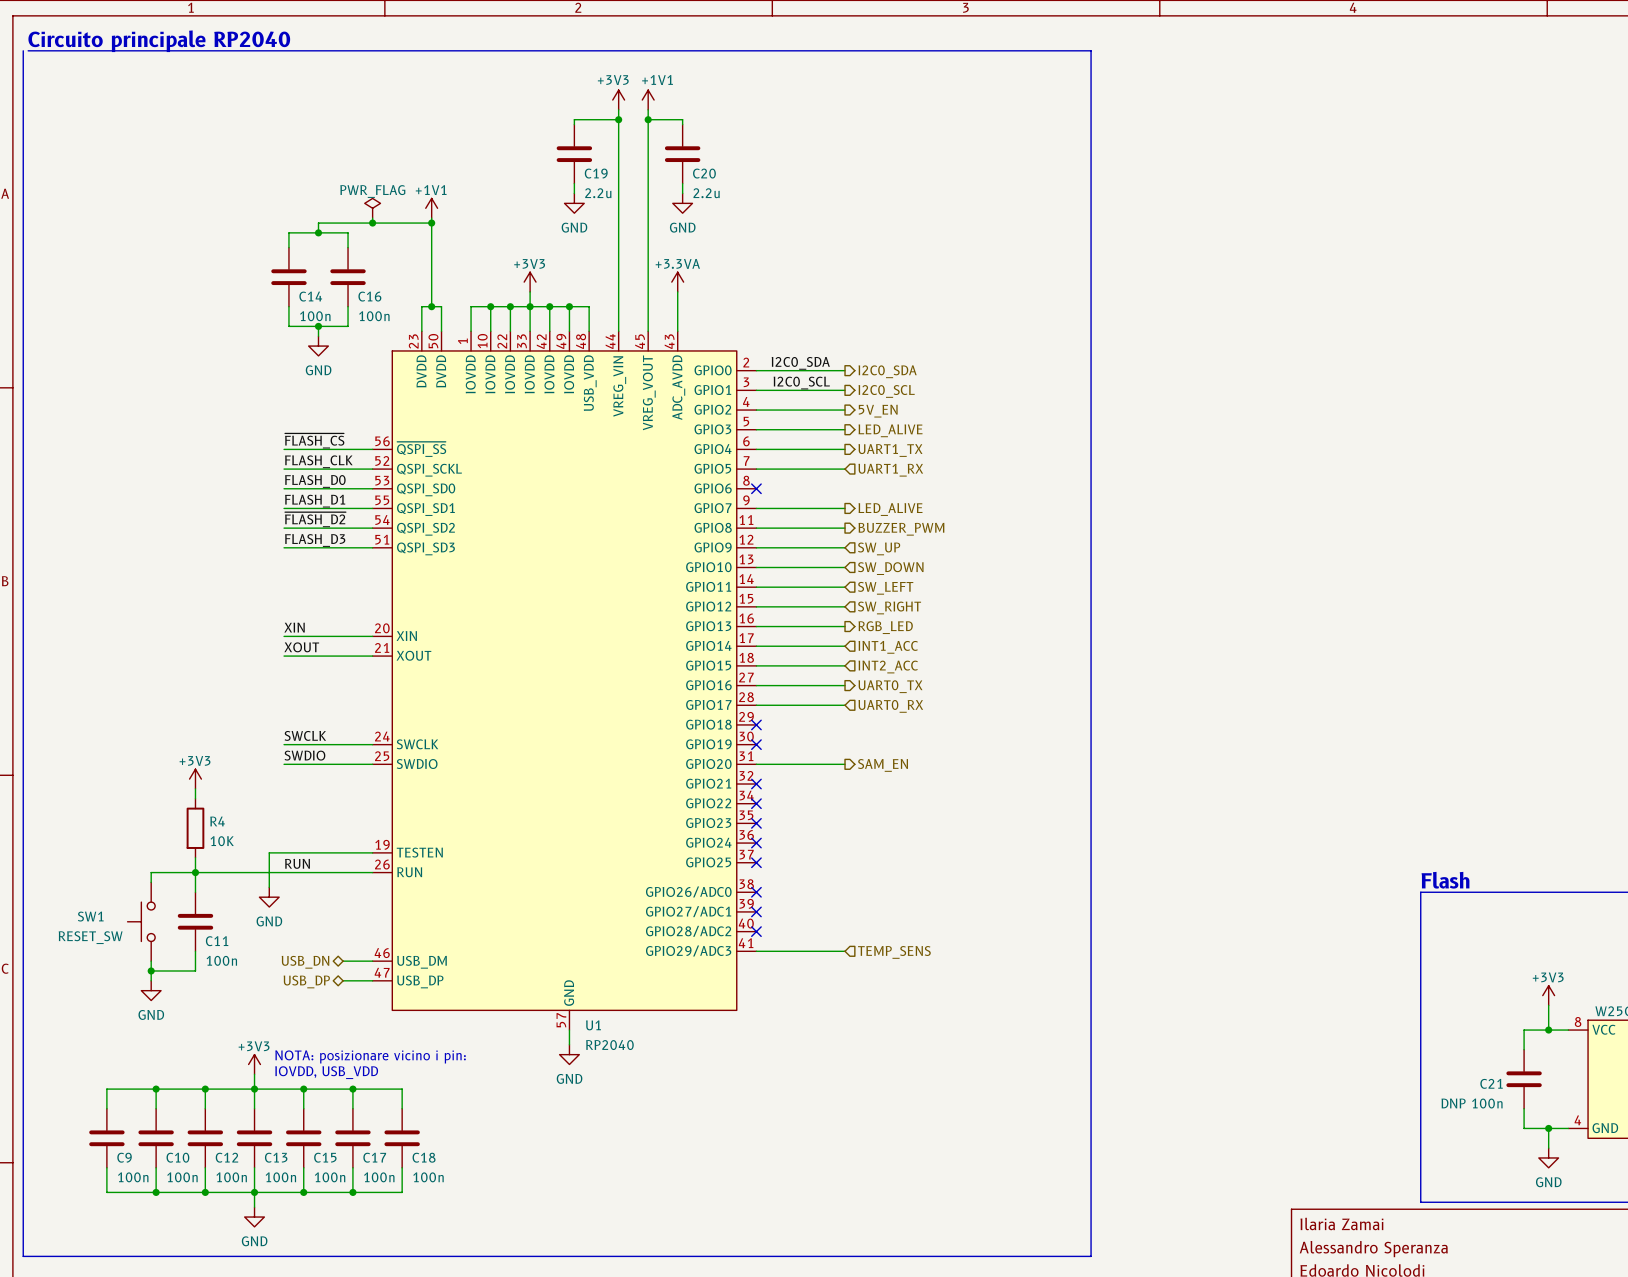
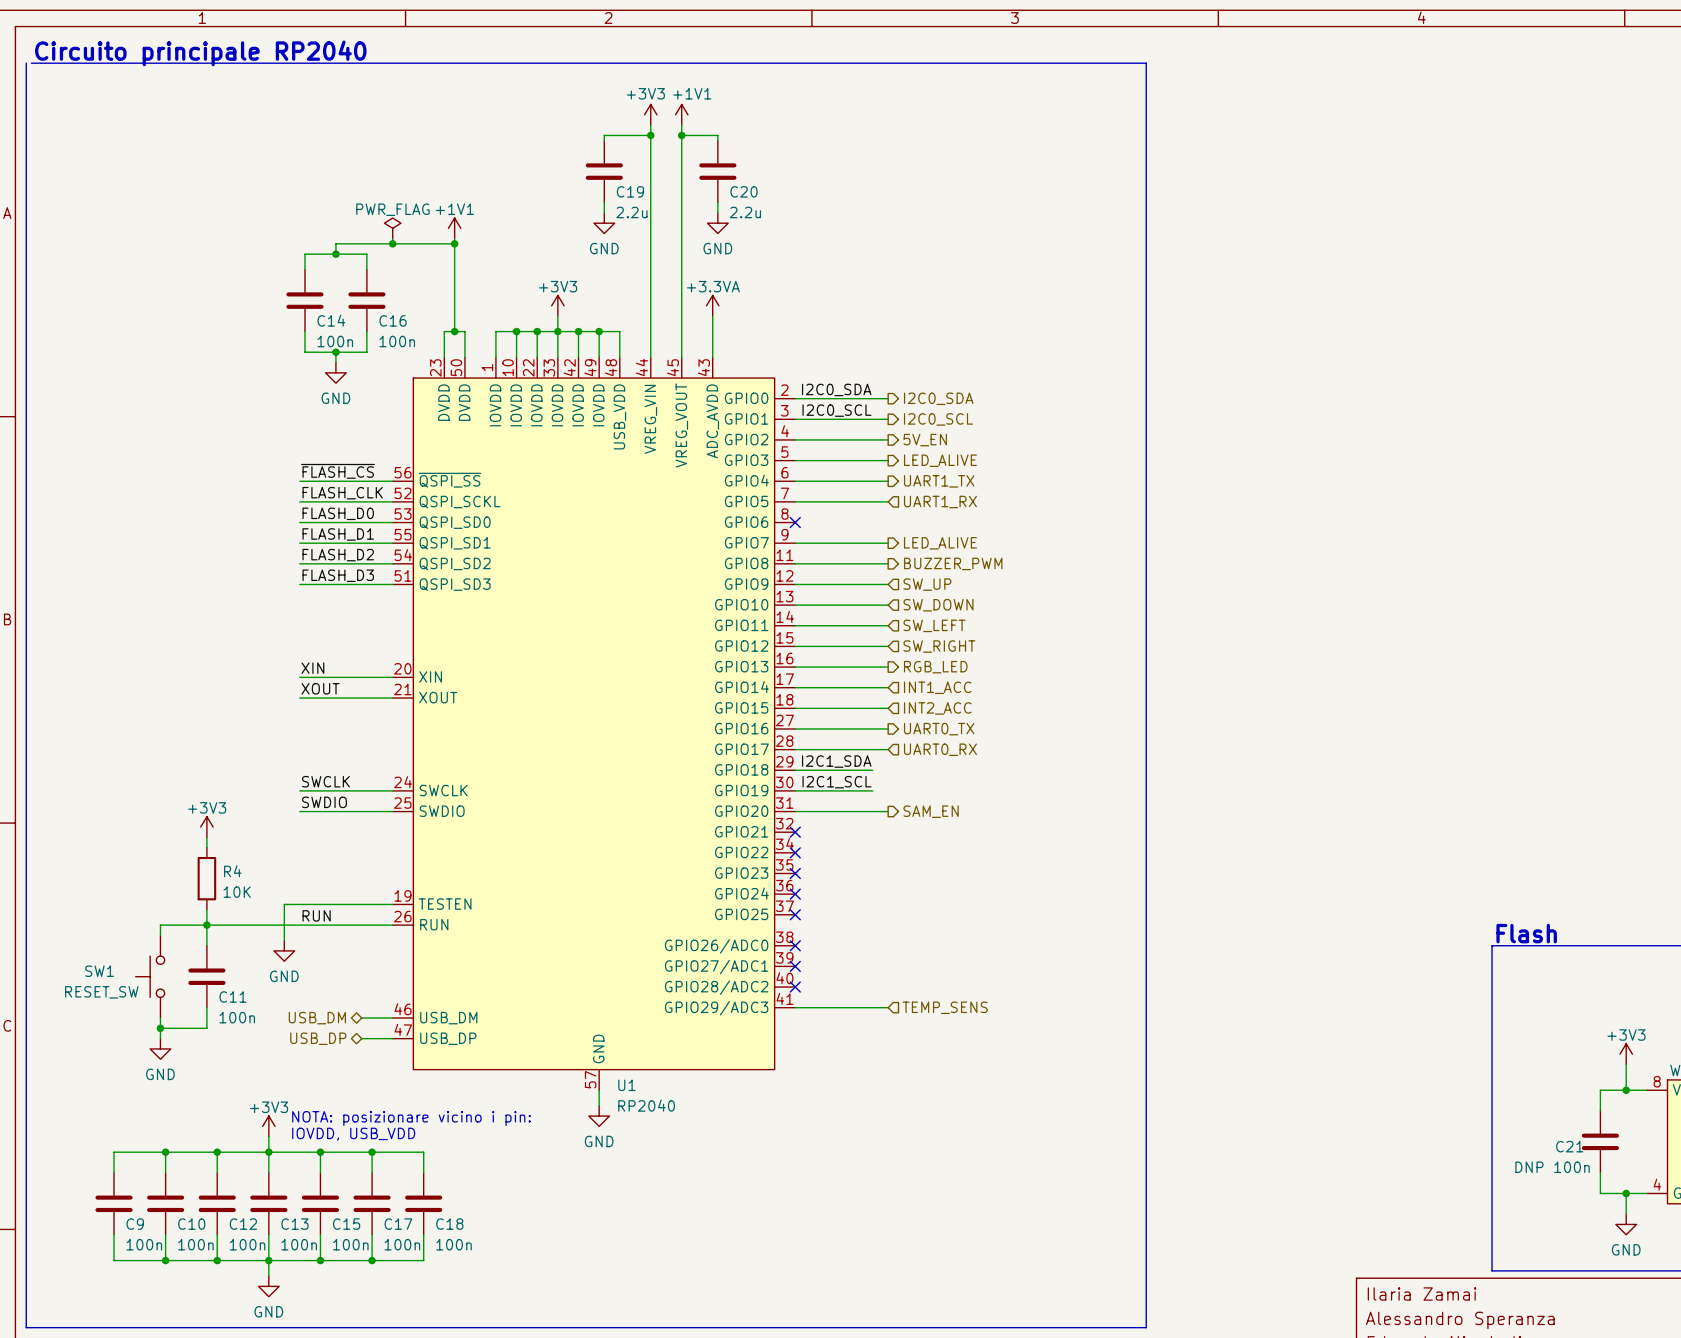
label: ~{FLASH_D2} (315, 519) -> FLASH_D2 (338, 555)
label: none -> I2C1_SDA (836, 761)
wire: none -> (795, 770) (872, 770)
no-connect mark: (756, 724) -> none
label: none -> I2C1_SCL (836, 782)
wire: none -> (795, 790) (872, 790)
no-connect mark: (756, 744) -> none
hierarchical label: USB_DN (305, 962) -> USB_DM (317, 1018)

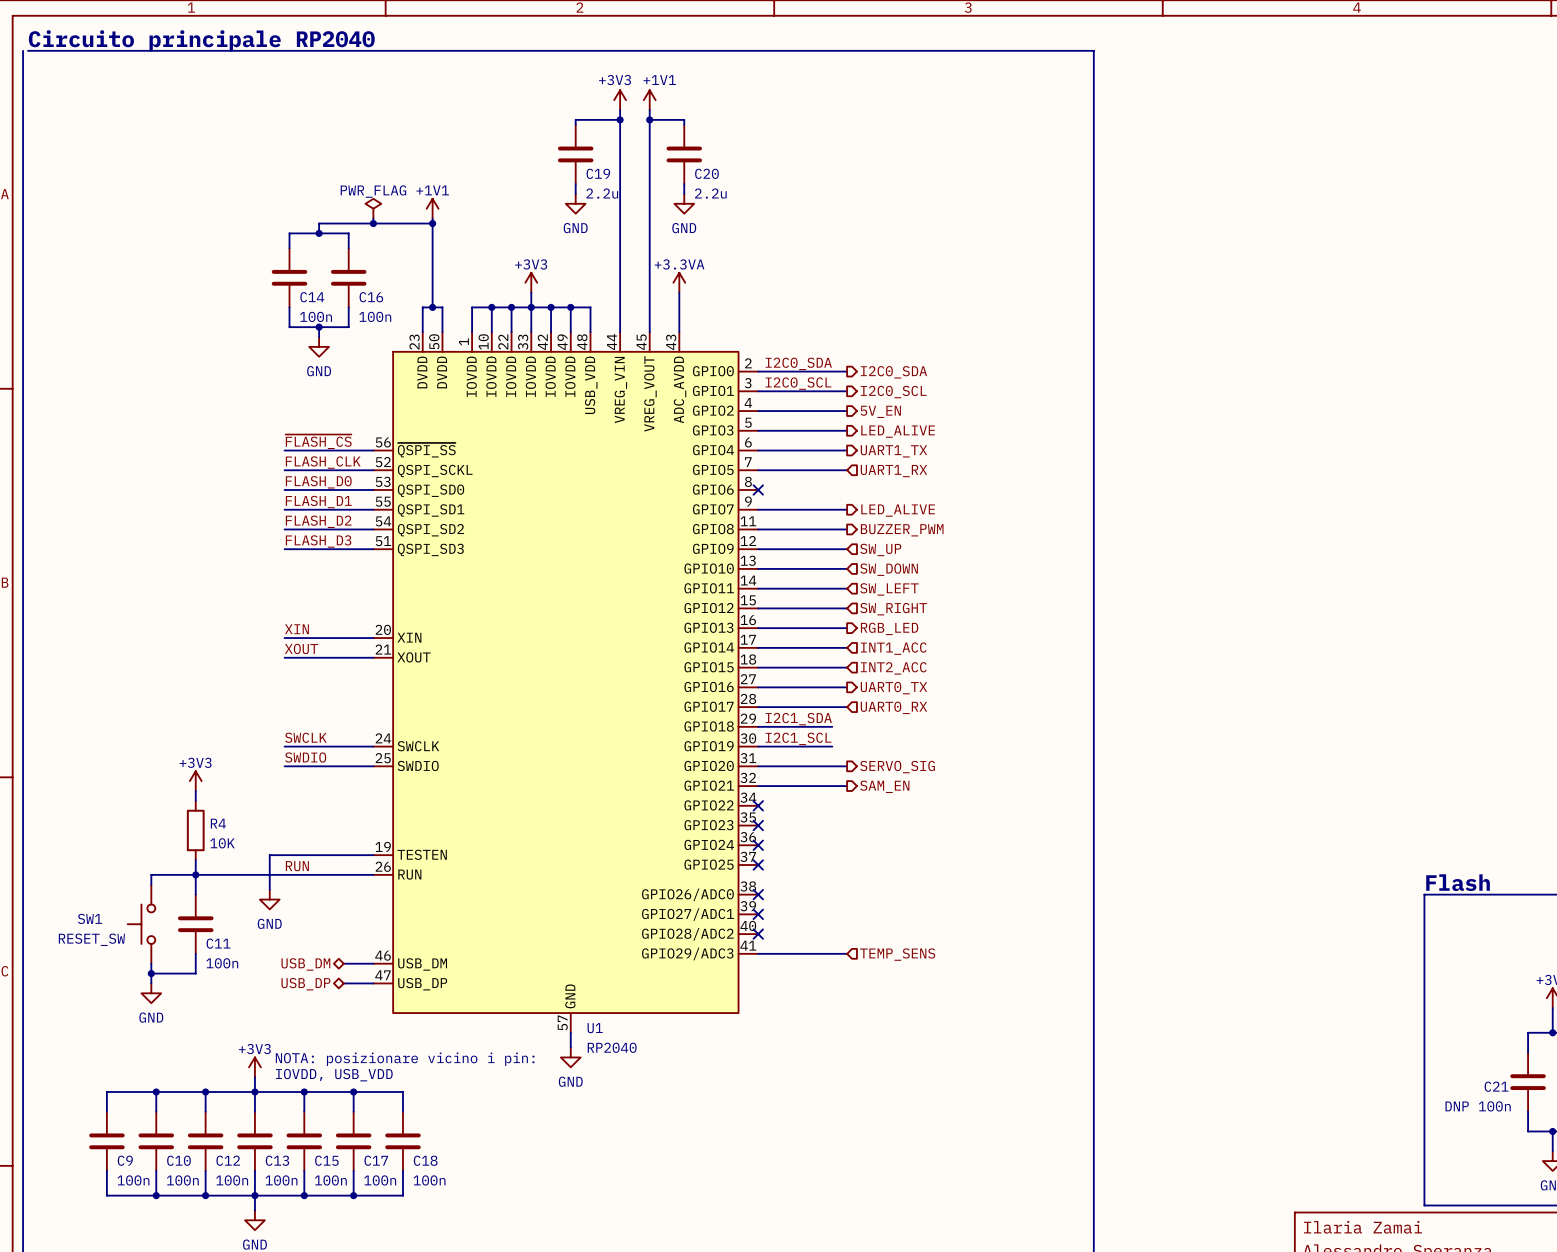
hierarchical label: SAM_EN (931, 811) -> SERVO_SIG (897, 767)
wire: none -> (758, 786) (847, 786)
no-connect mark: (795, 832) -> none
hierarchical label: none -> SAM_EN (884, 786)

